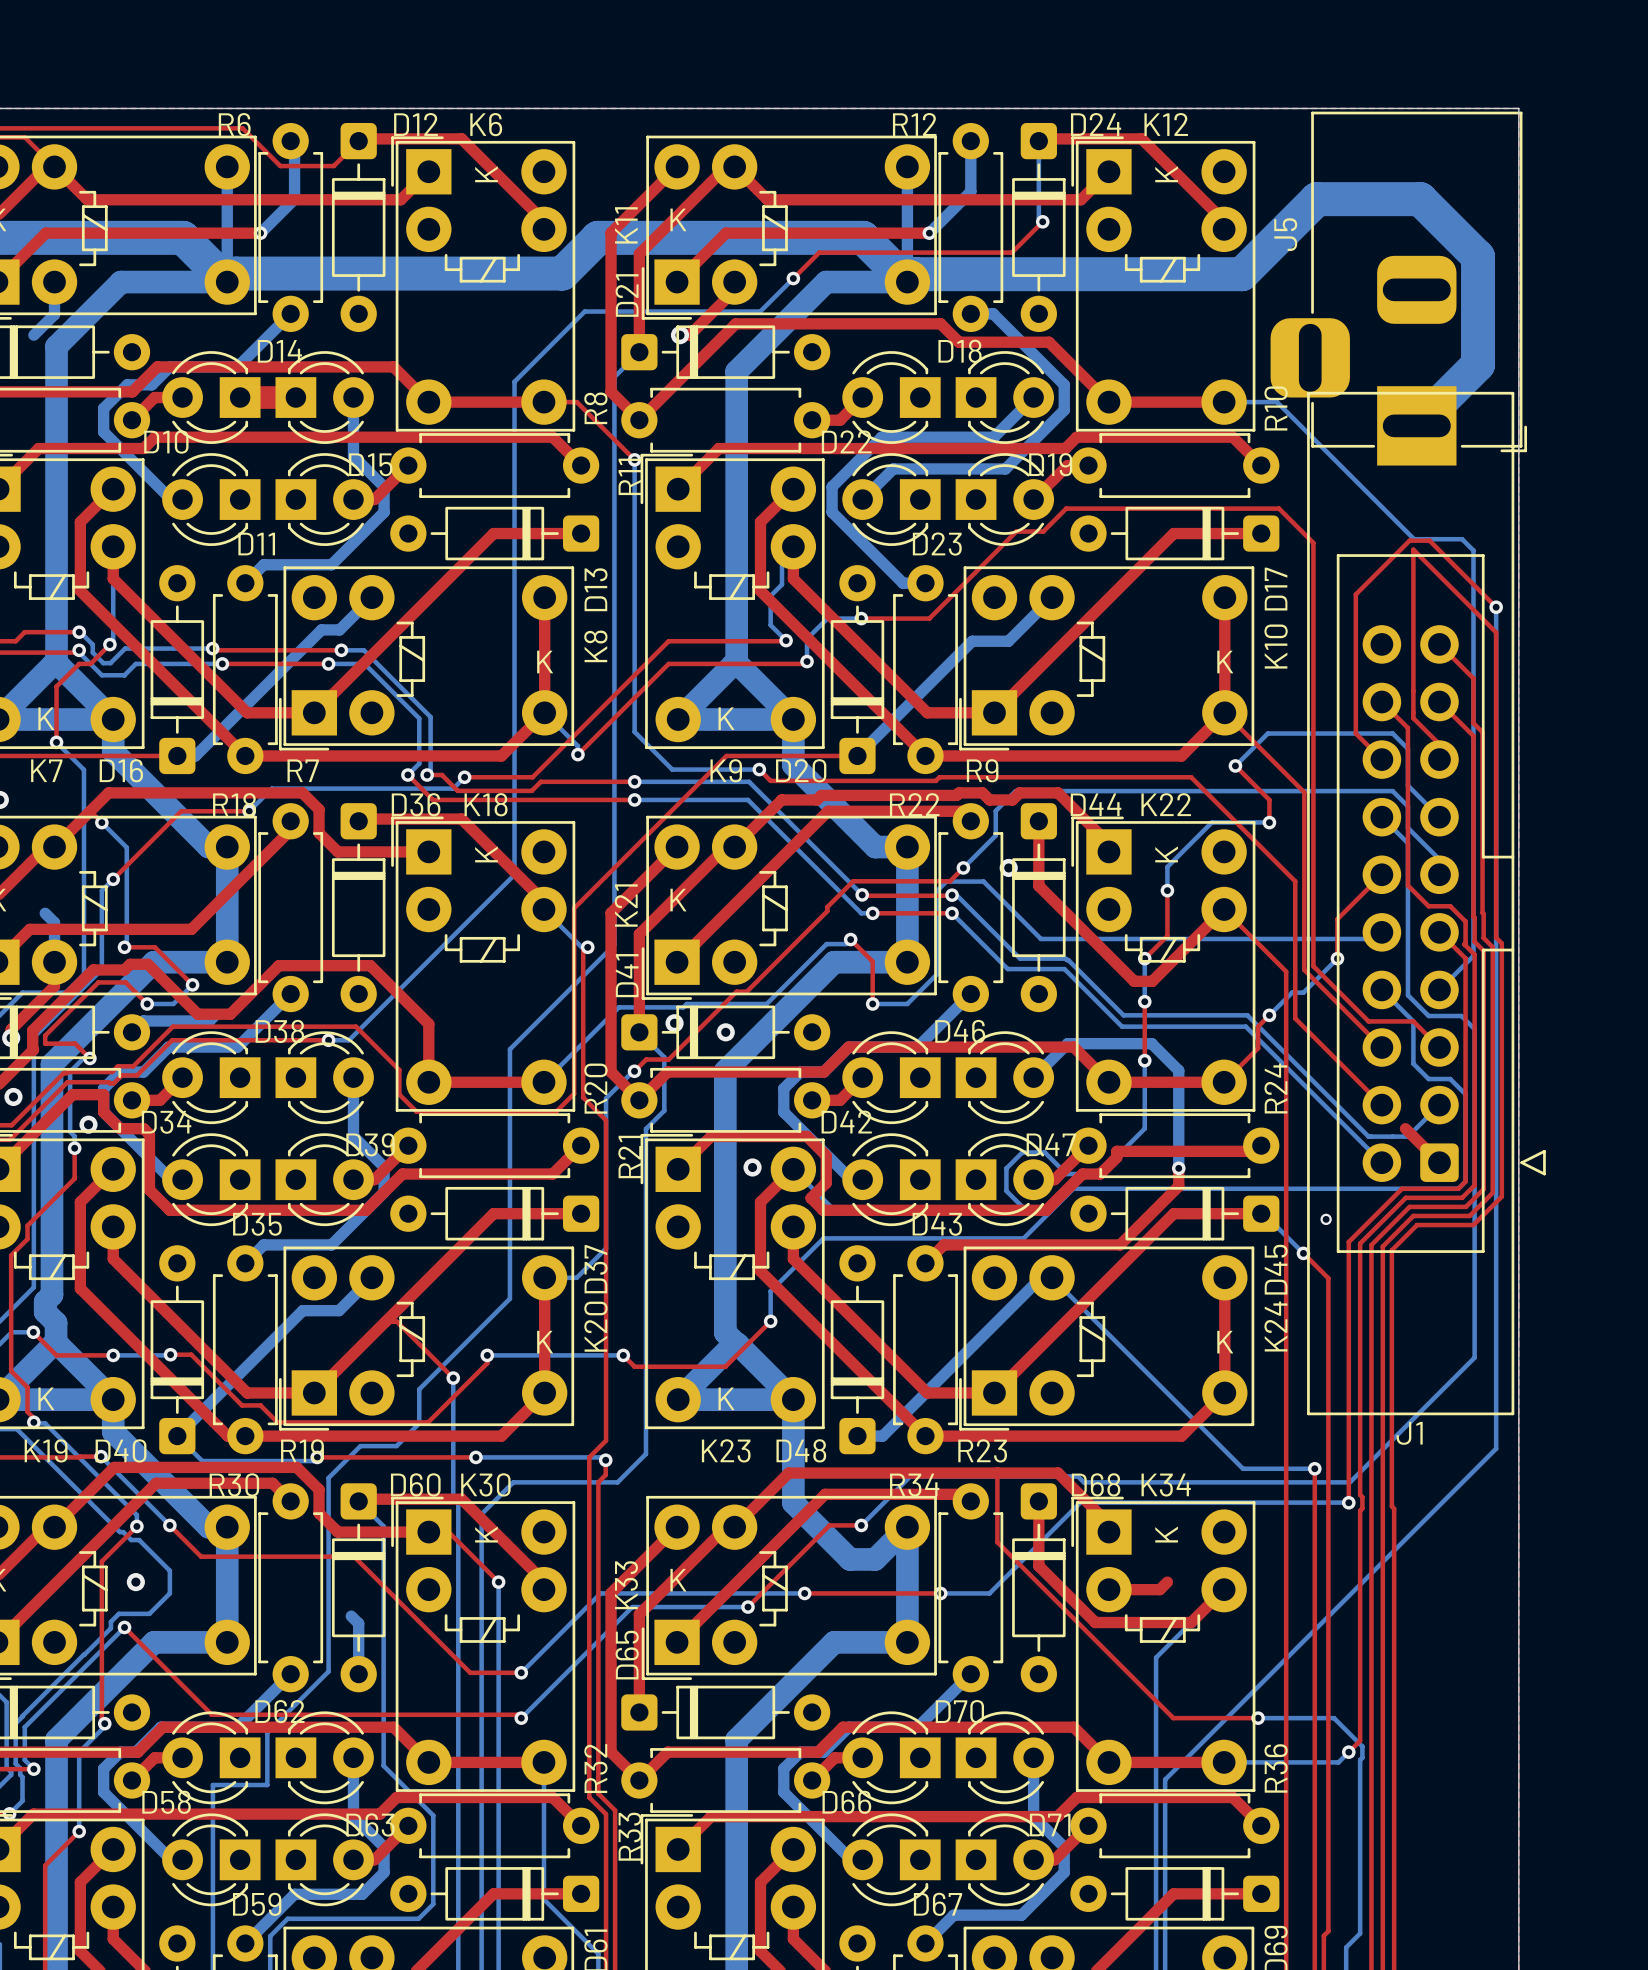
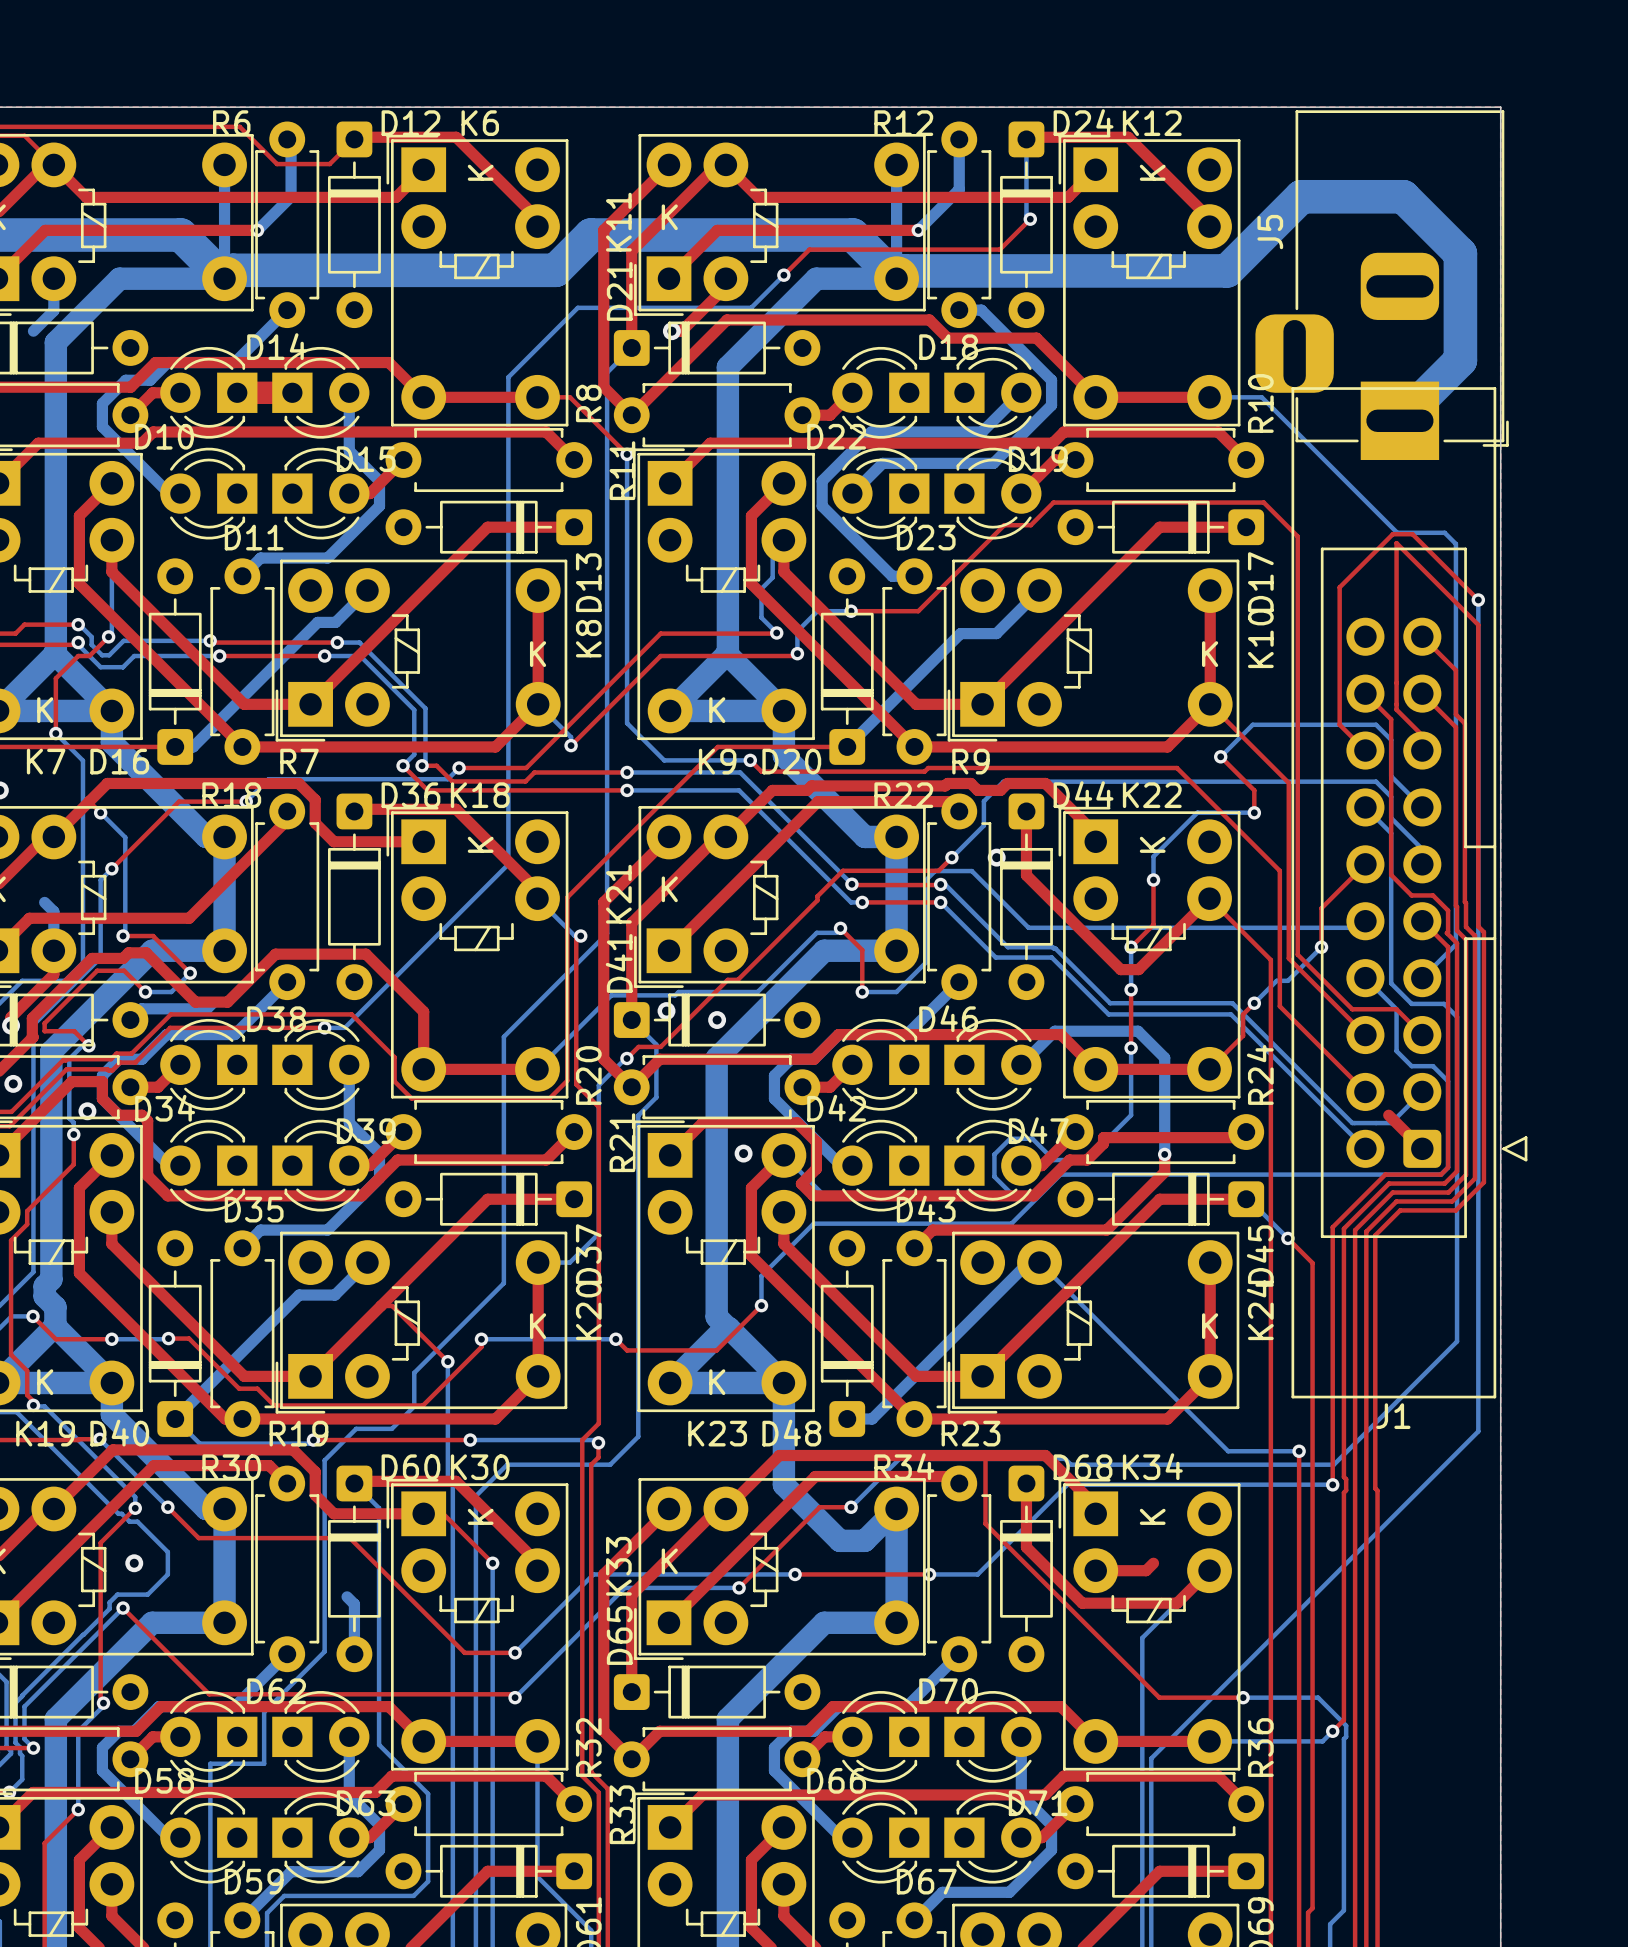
via: (1326, 1219) -> none

